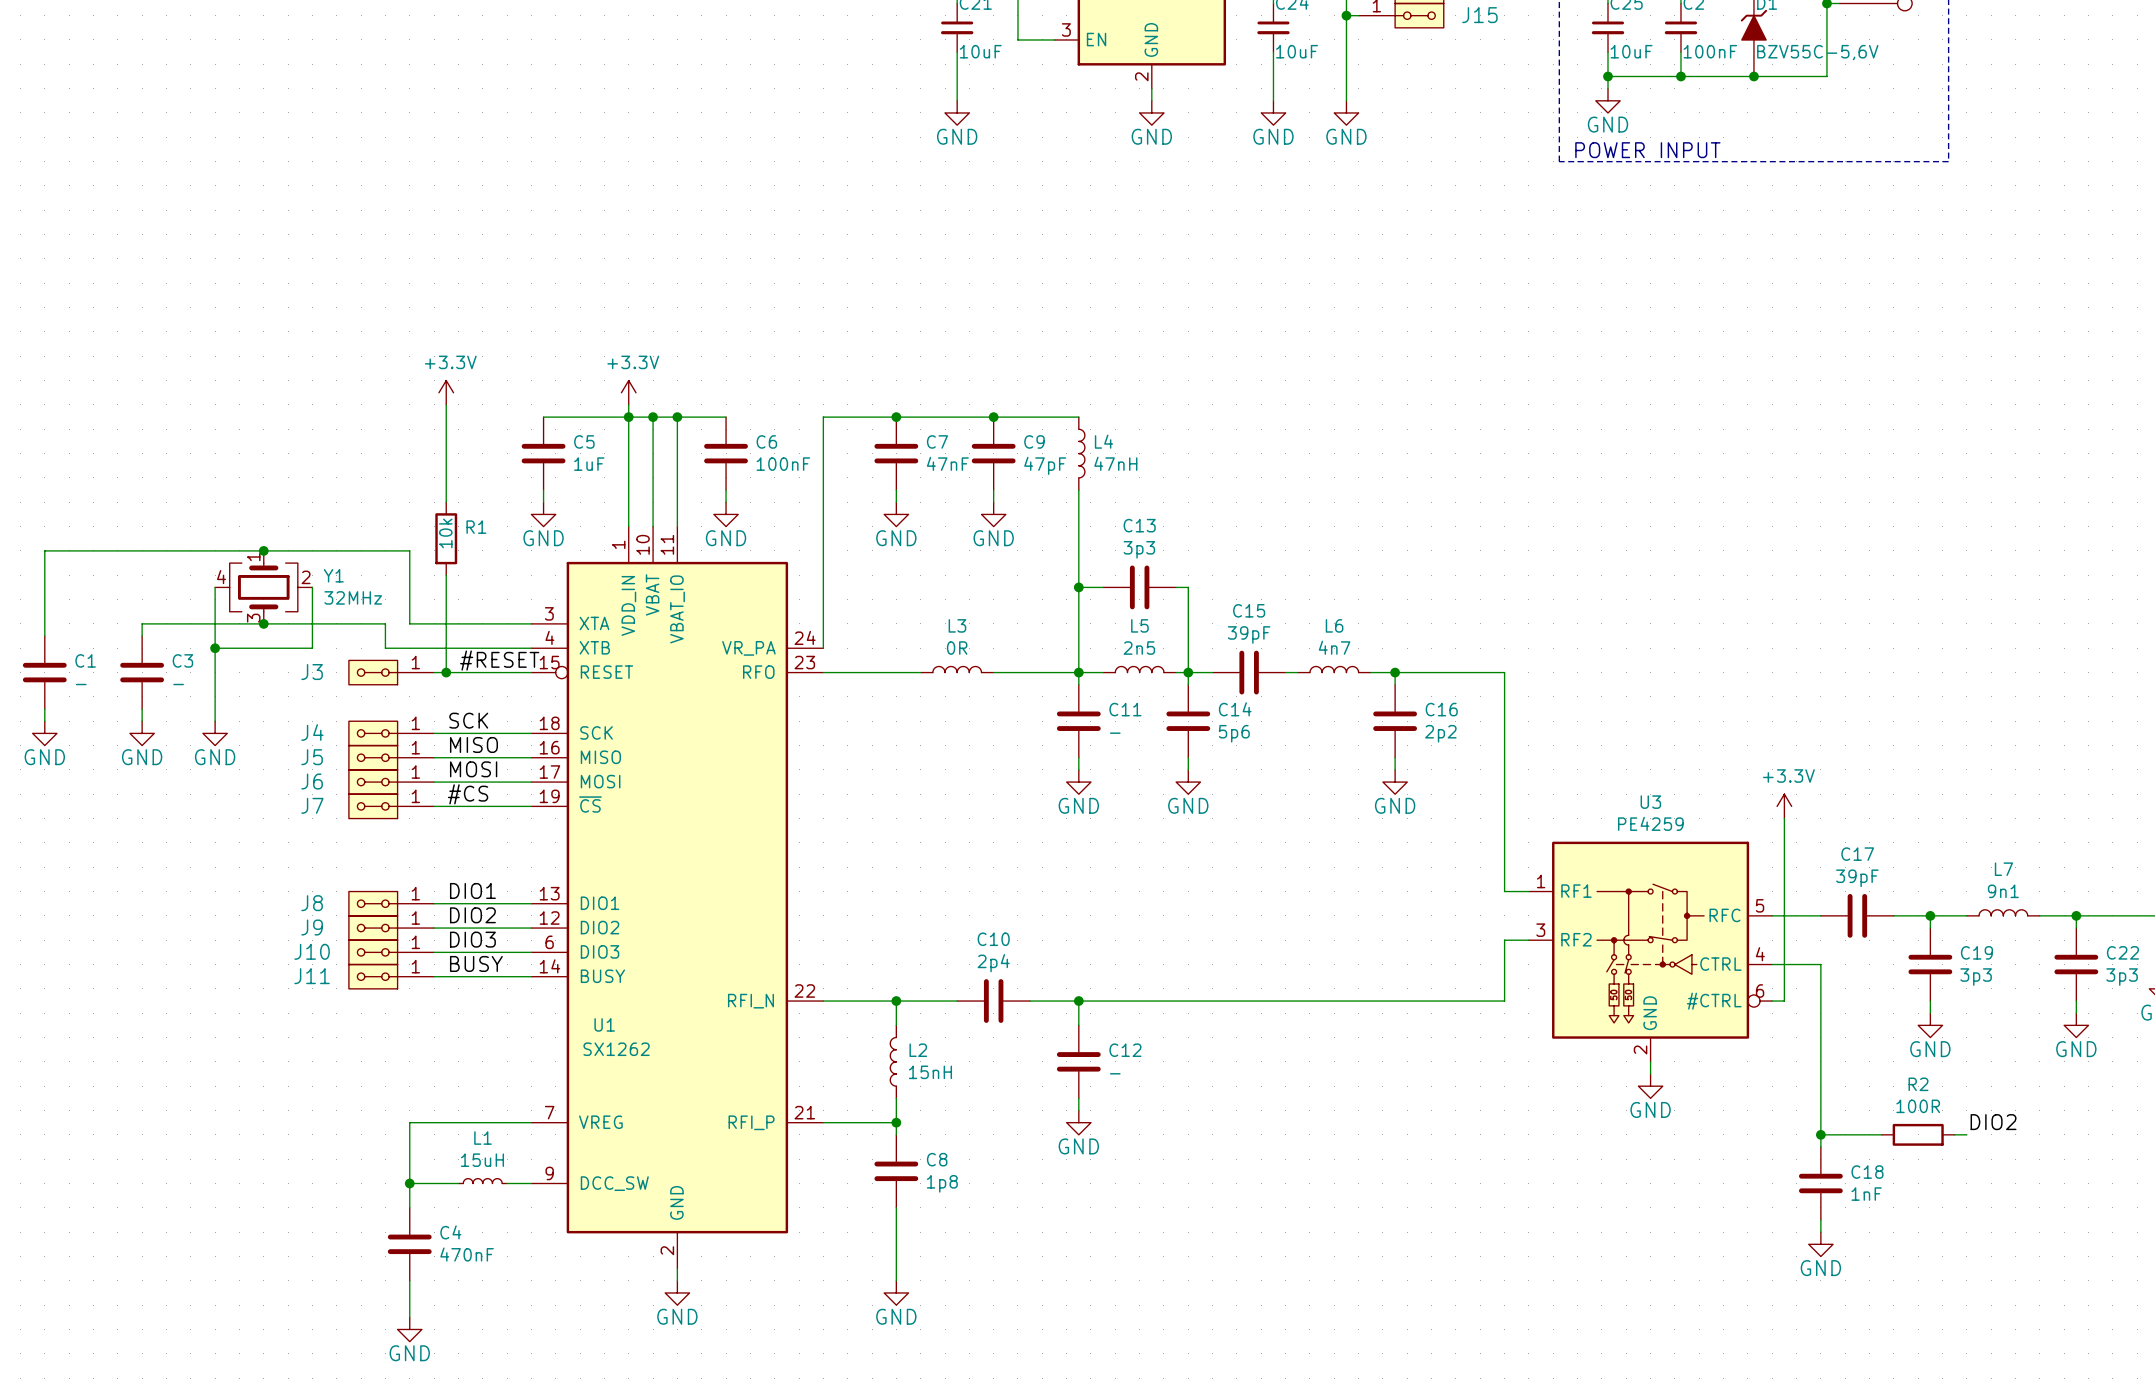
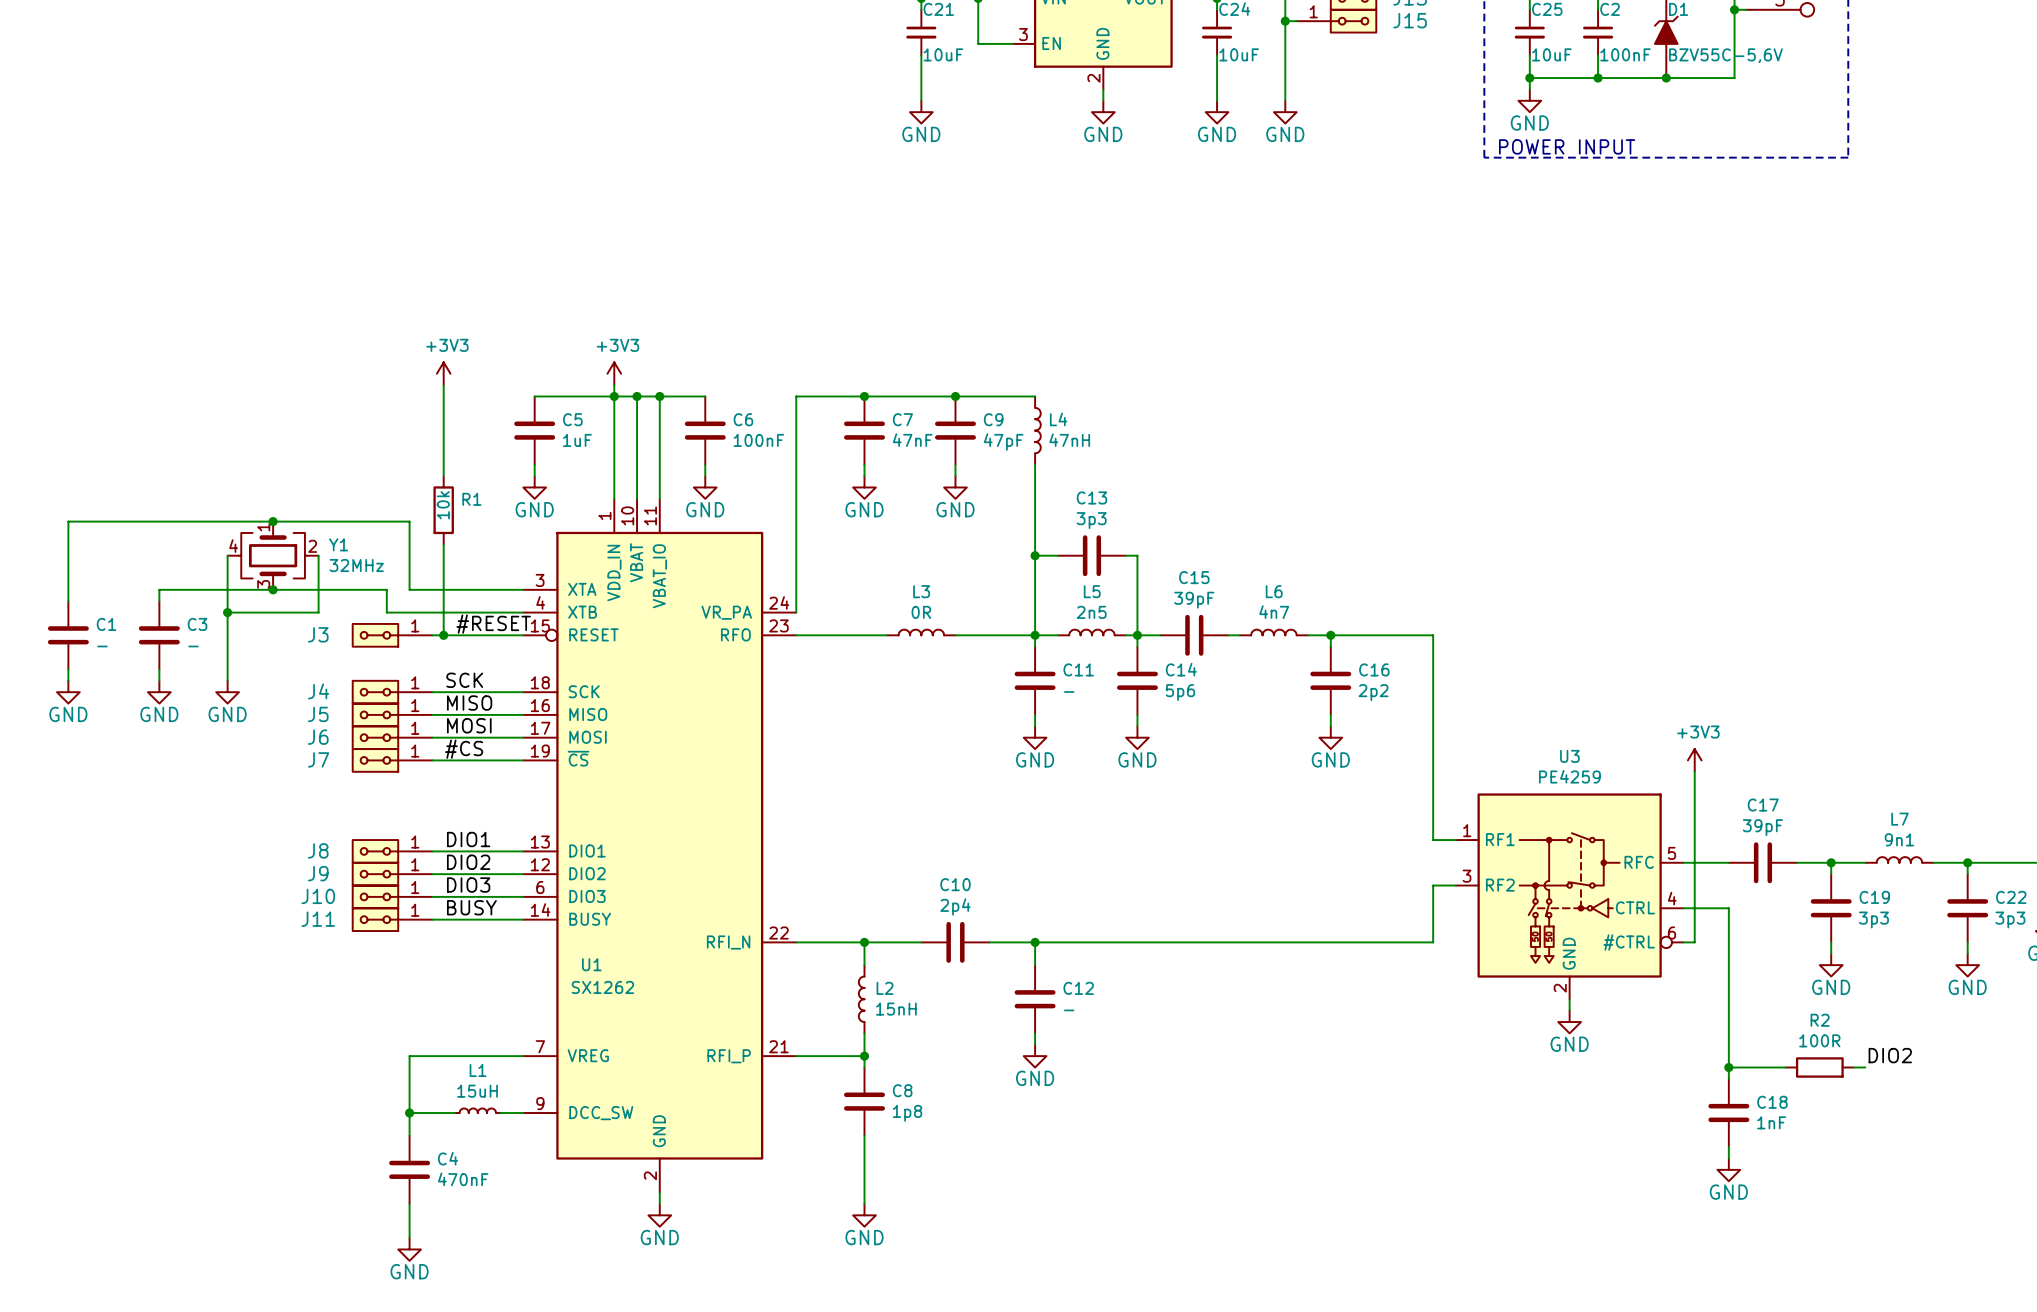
power symbol: +3.3V (446, 392) -> +3V3 (443, 373)
power symbol: +3.3V (628, 392) -> +3V3 (614, 373)
power symbol: +3.3V (1784, 806) -> +3V3 (1694, 760)

